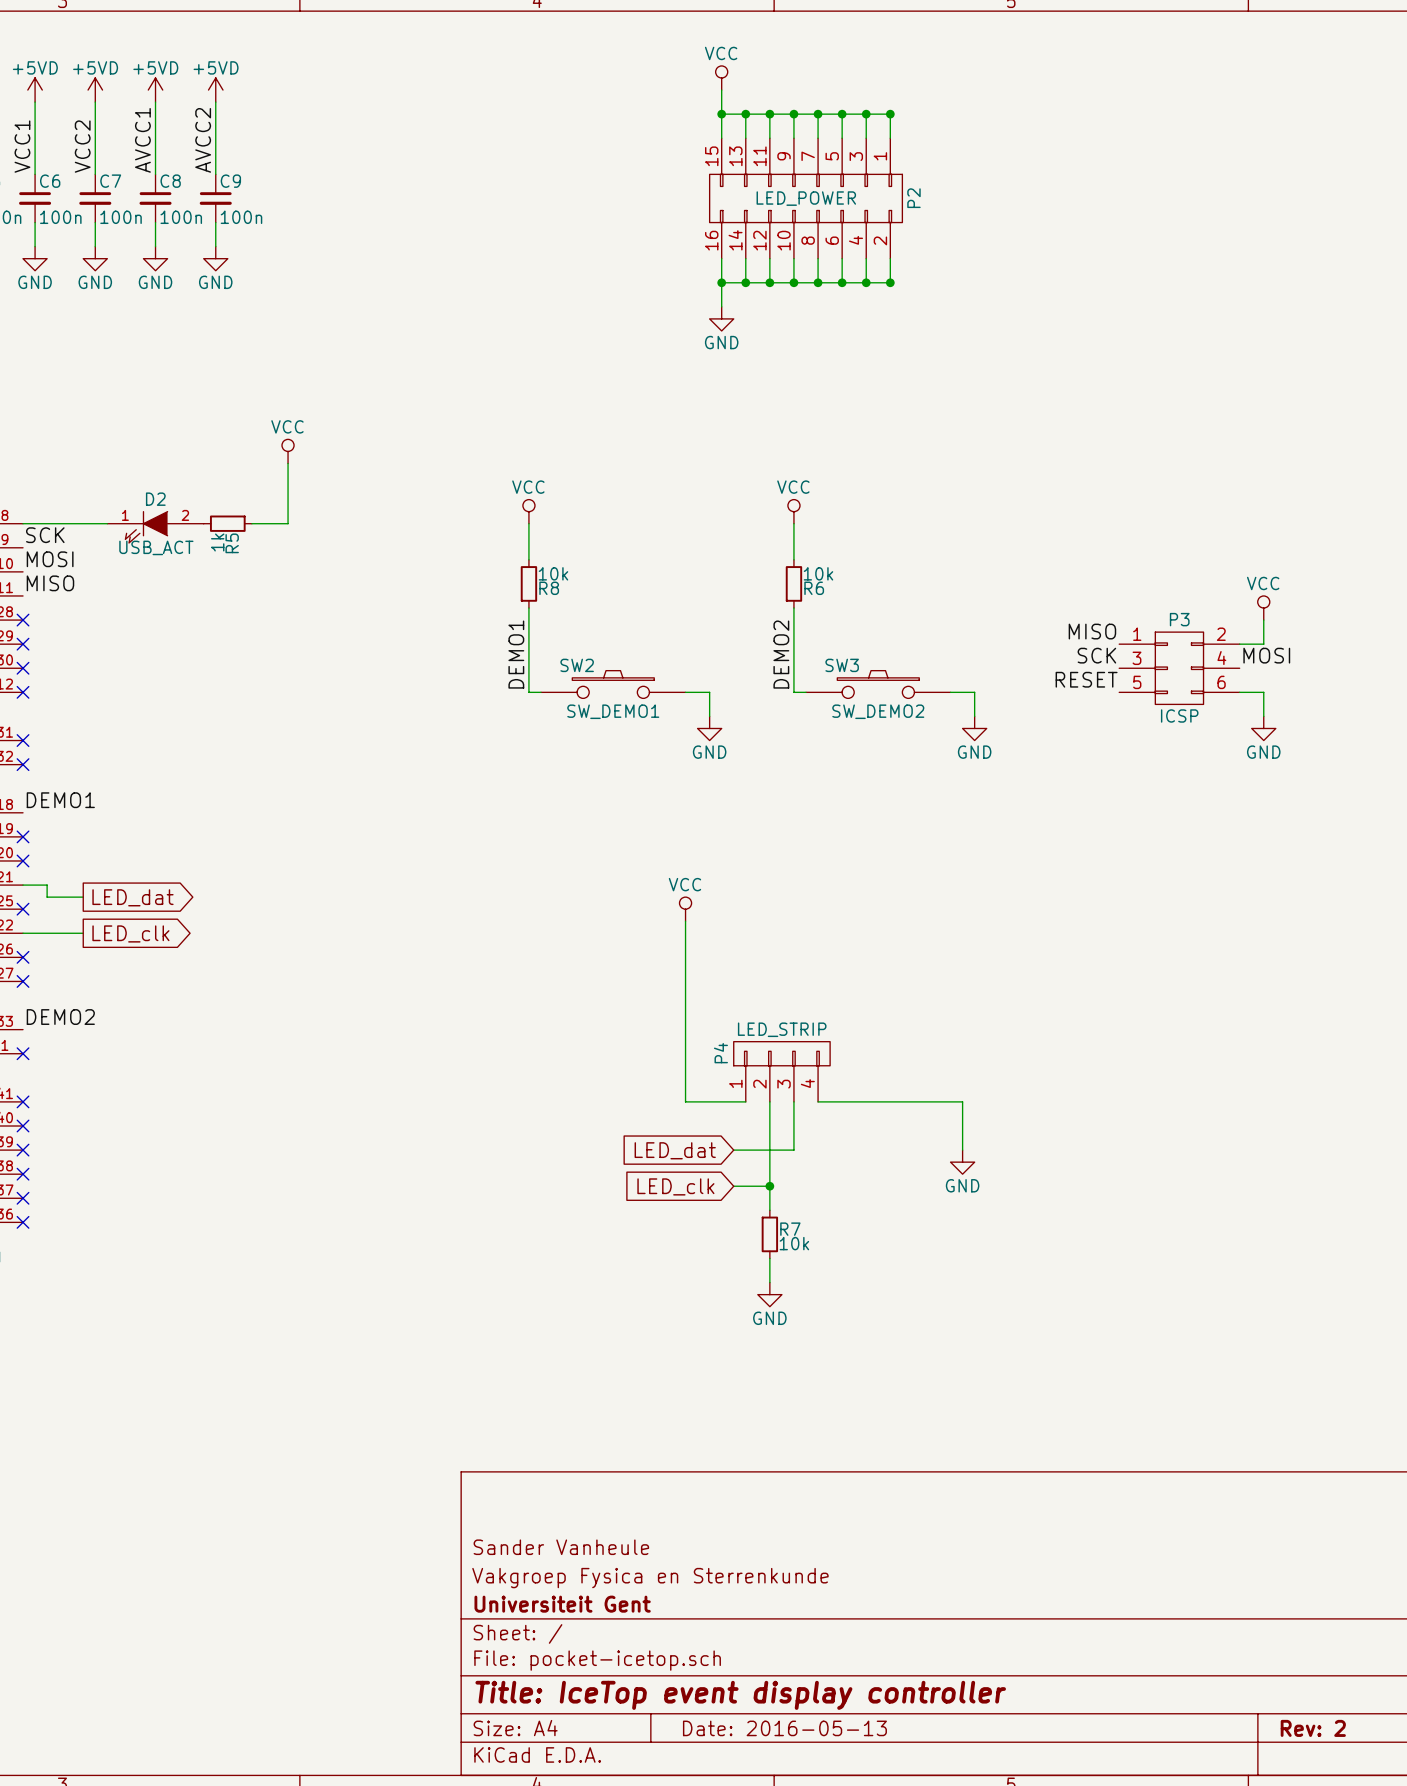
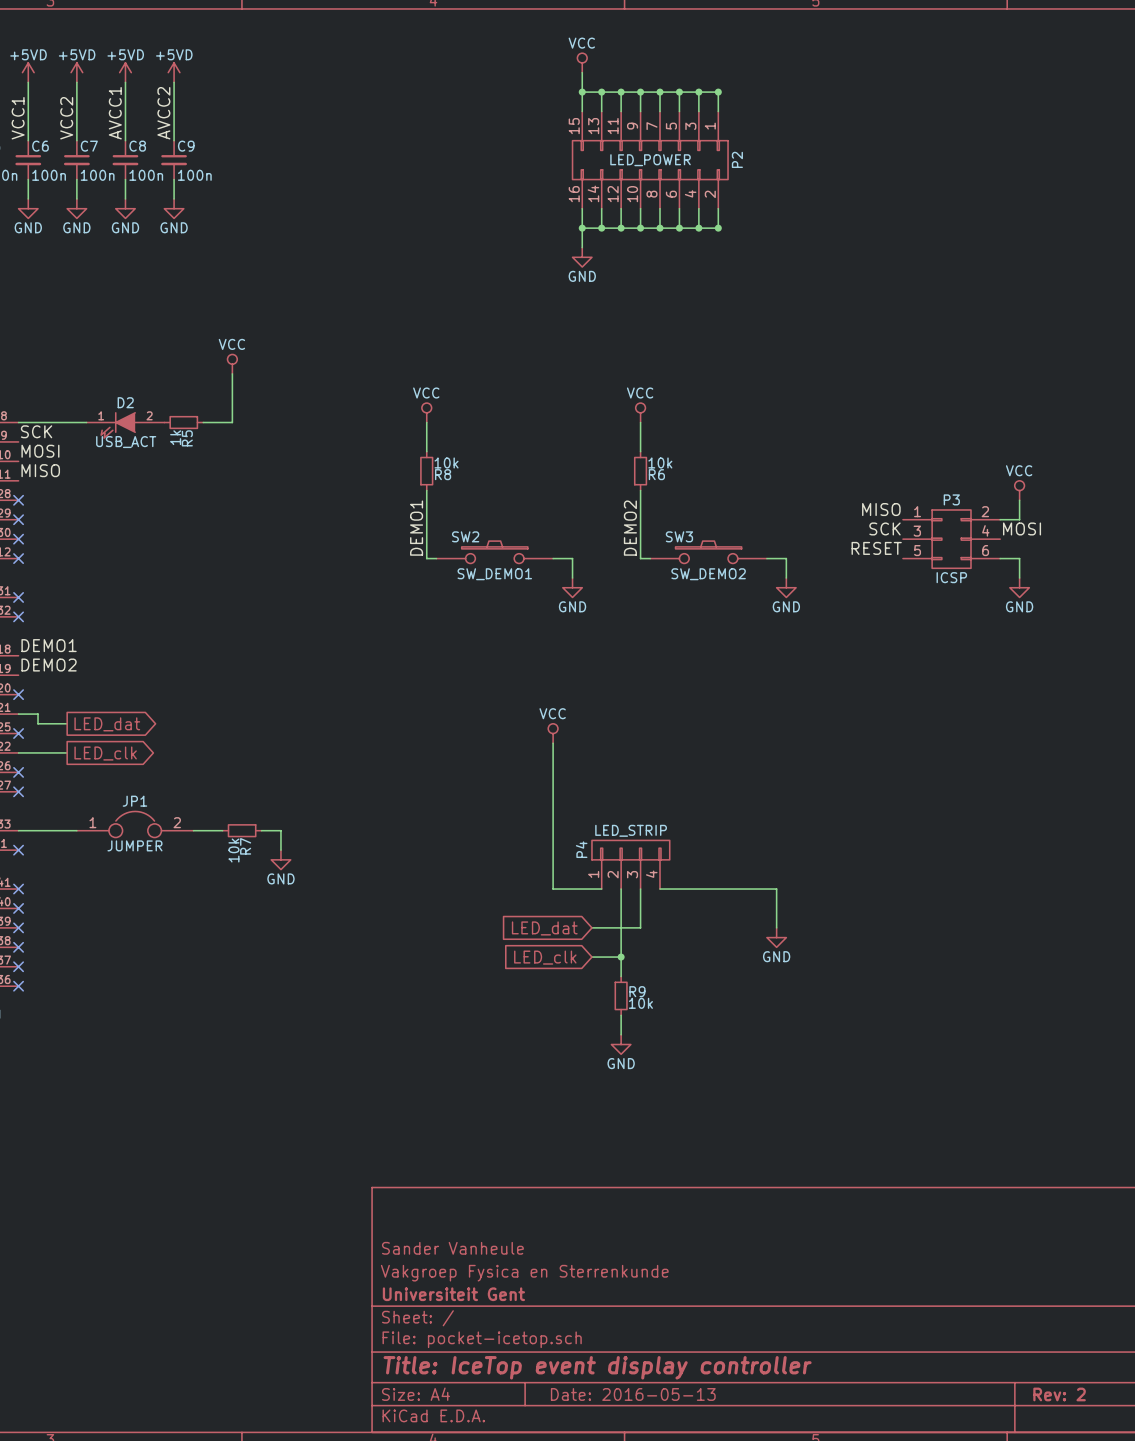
no-connect mark: (23, 836) -> none
label position: DEMO2 (60, 1017) -> DEMO2 (49, 665)
JP1: none -> JUMPER (135, 824)
wire: none -> (18, 830) (76, 830)
wire: none -> (193, 830) (222, 830)
R7: none -> 10k (242, 830)
wire: none -> (261, 830) (280, 830) (280, 850)
power symbol: none -> GND (280, 859)
R7 name: R7 (790, 1229) -> R9 (637, 991)

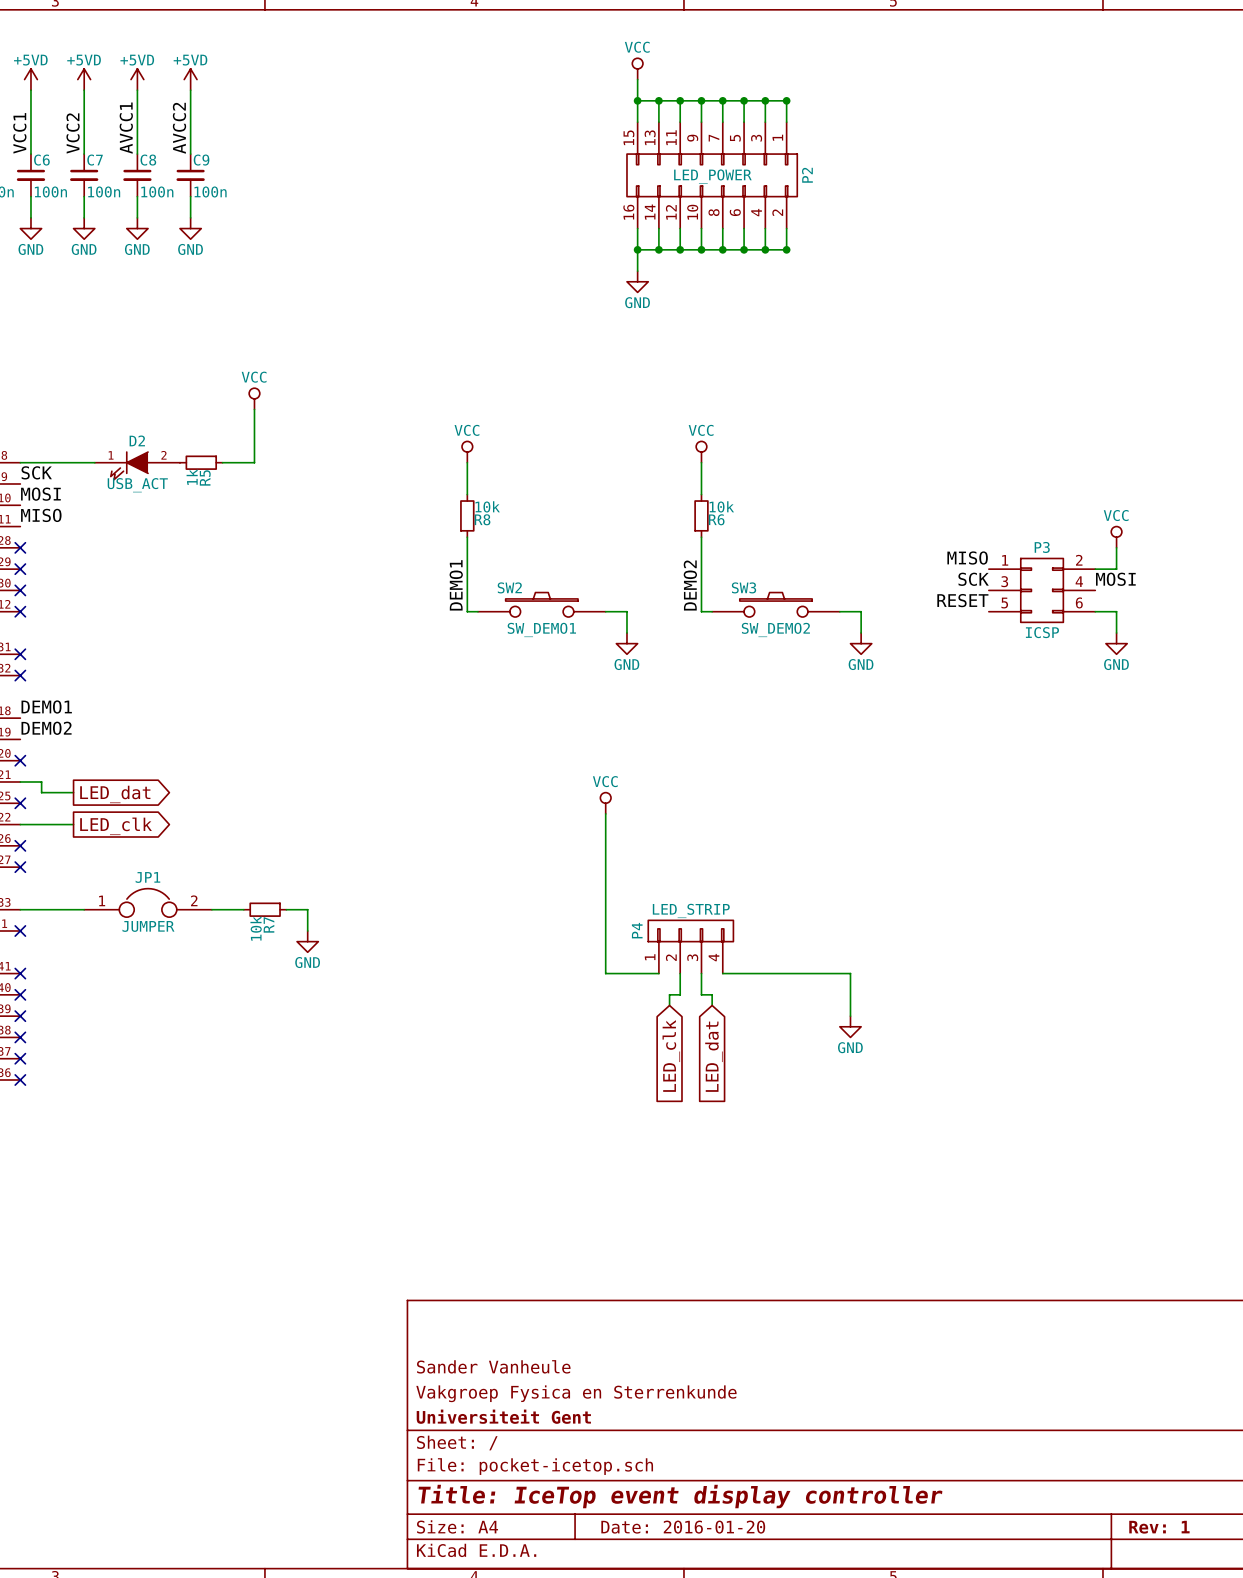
wire: (621, 908) (621, 976) -> (680, 994) (669, 994) (669, 1005)
wire: (640, 908) (640, 927) (591, 927) -> (701, 994) (712, 994) (712, 1005)
global label rotation: 0° (544, 928) -> 90° counterclockwise (713, 1056)
global label position: LED_dat (544, 928) -> LED_dat (713, 1056)
global label rotation: 0° (545, 957) -> 90° counterclockwise (671, 1055)
wire: (591, 957) (621, 957) -> none
junction: (621, 957) -> none
R9: 10k (621, 995) -> none
wire: (621, 1015) (621, 1034) -> none
power symbol: GND (621, 1044) -> none
title block: Date: 2016-05-13 (633, 1394) -> Date: 2016-01-20 (683, 1527)
title block: Rev: 2 (1059, 1394) -> Rev: 1 (1159, 1527)

